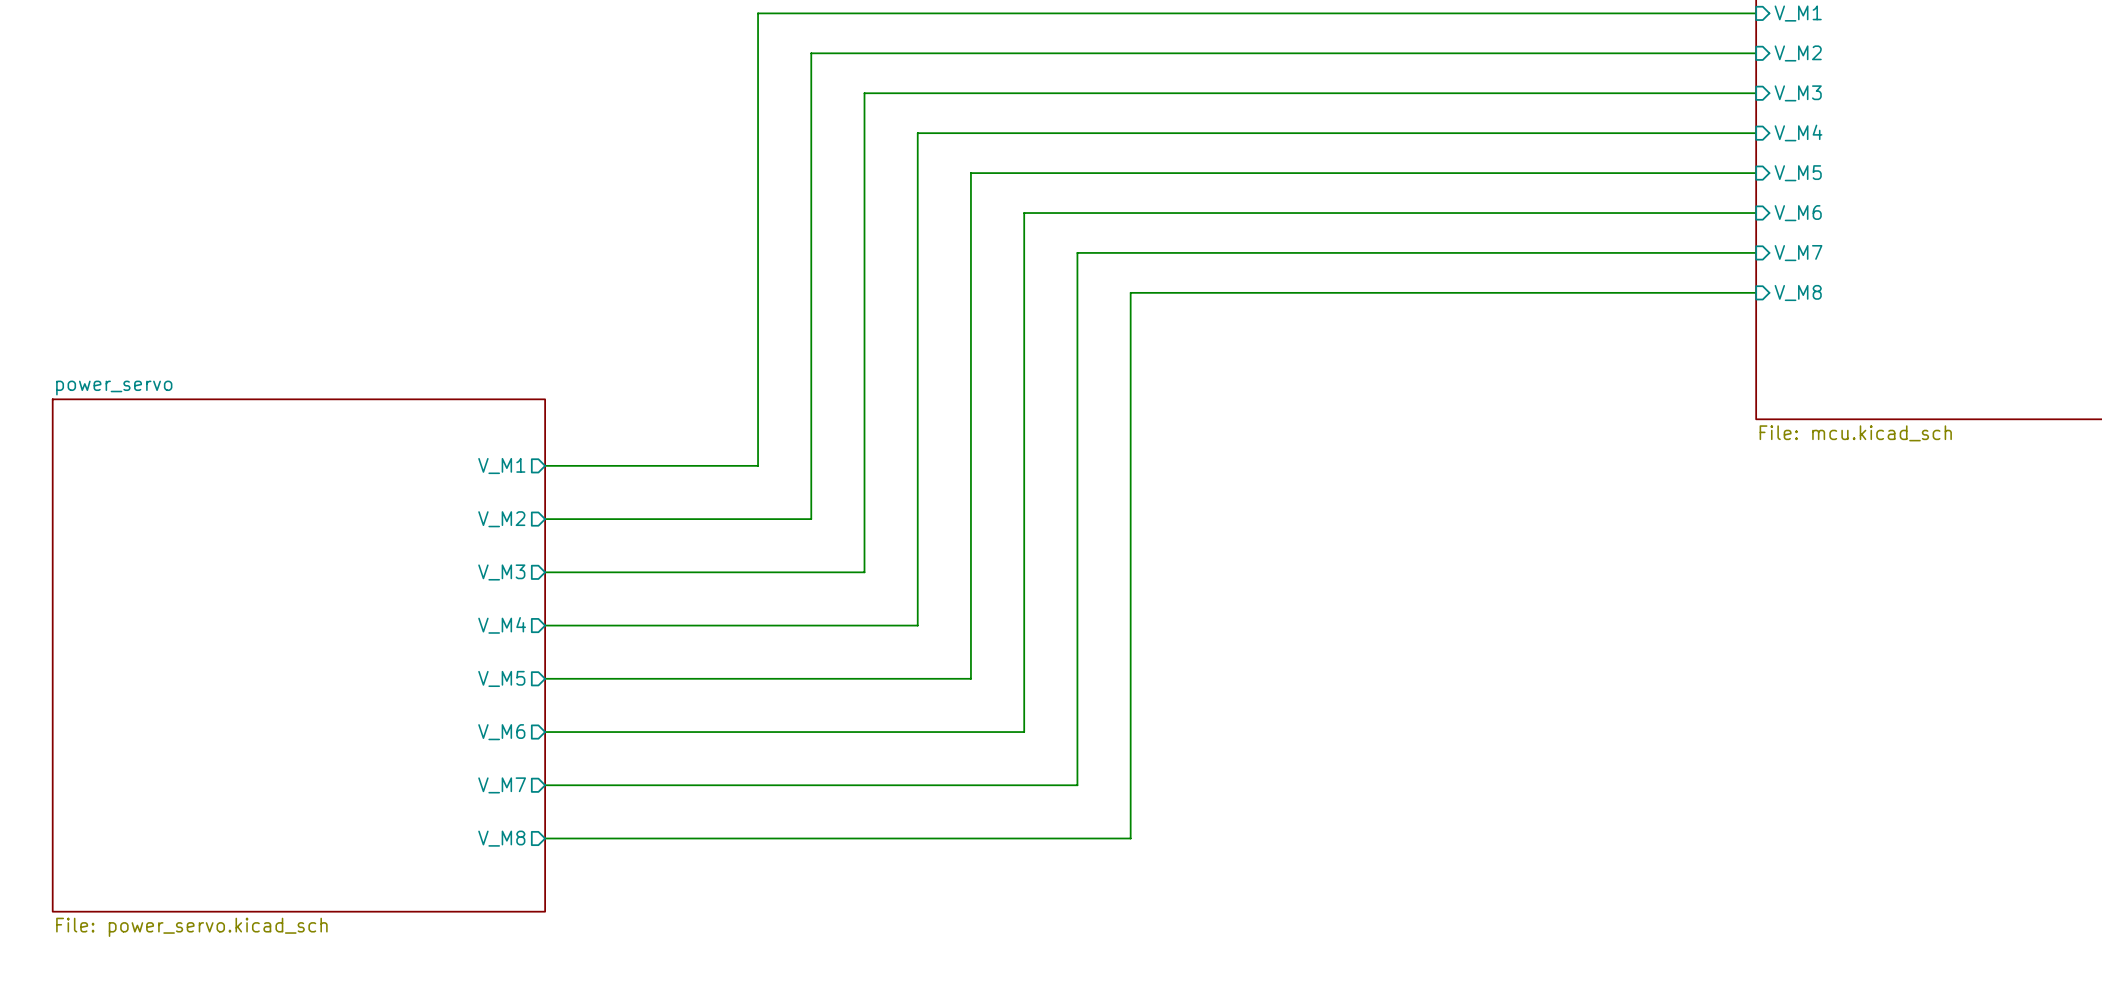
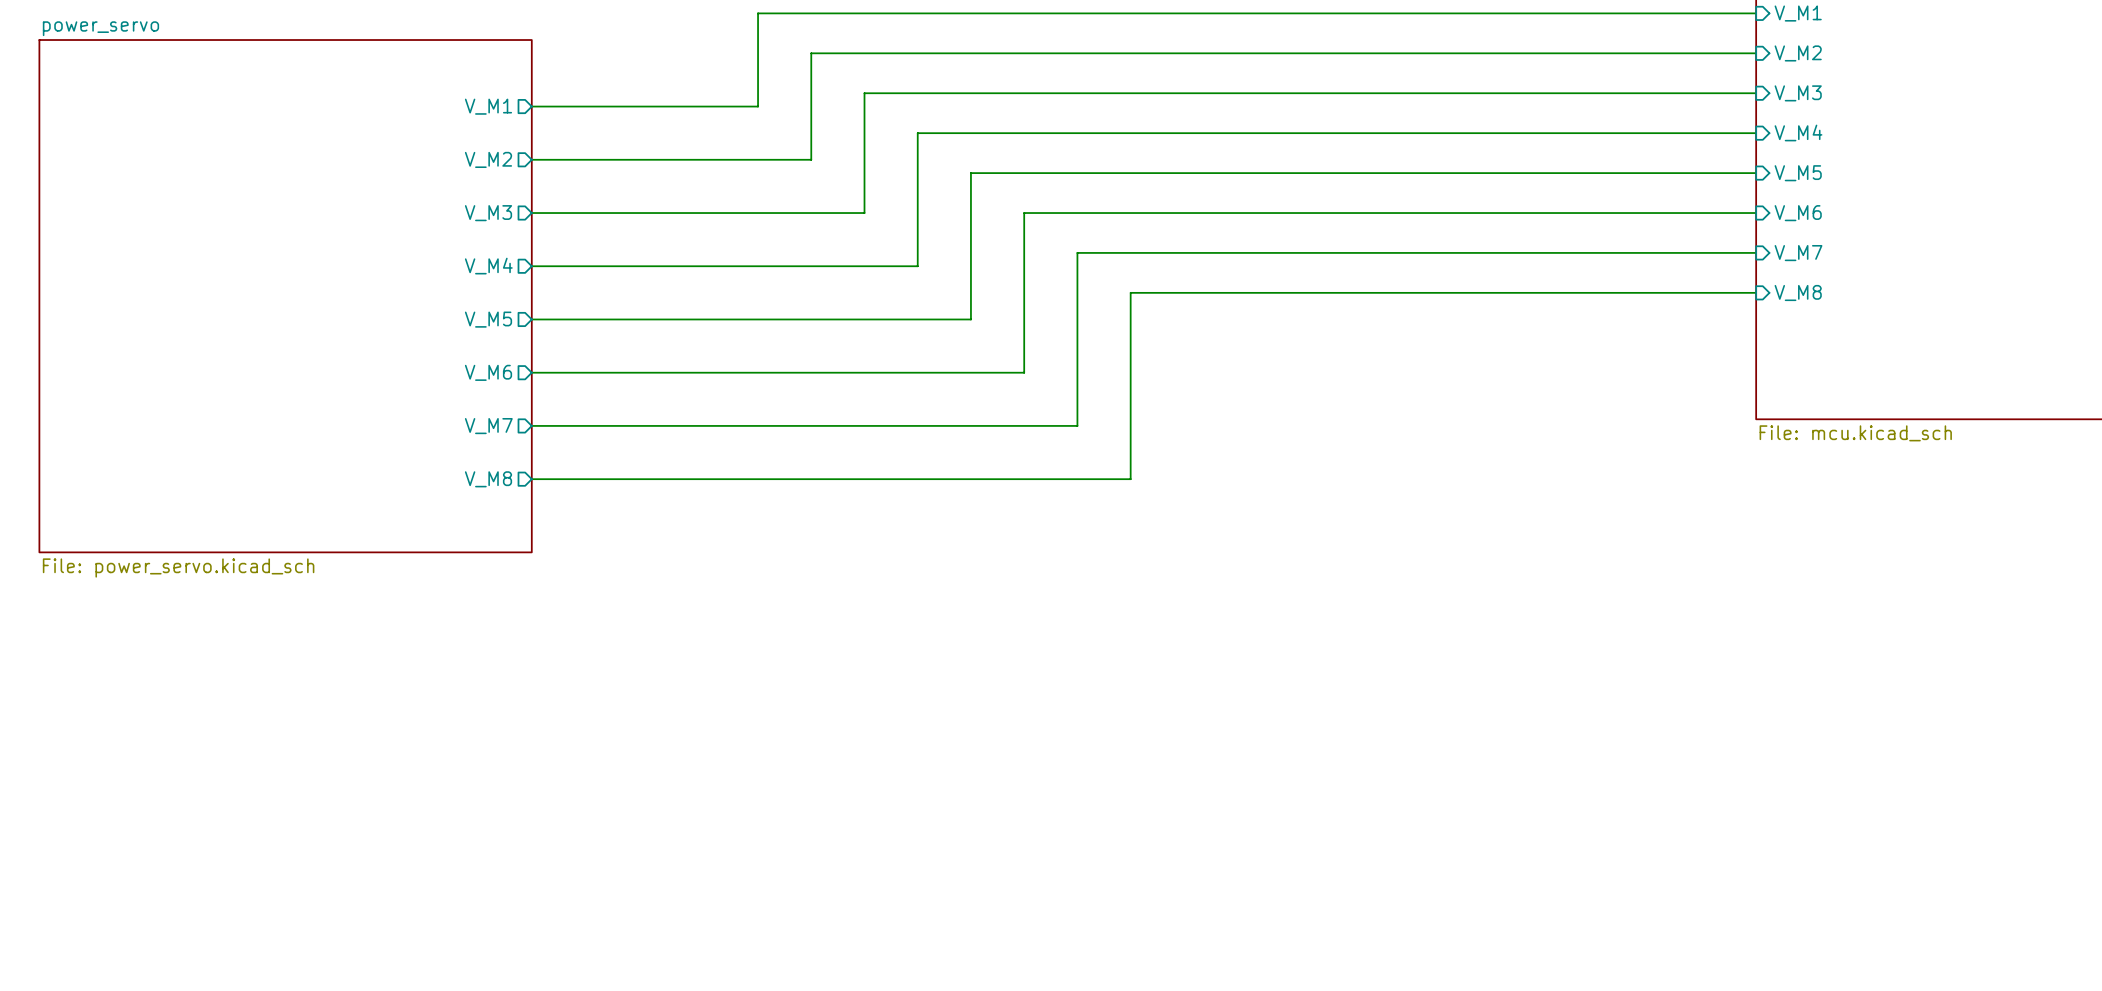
sheet pin: none -> V_M1 (488, 106)
wire: (758, 106) (758, 465) (545, 465) -> (758, 106) (531, 106)
sheet pin: none -> V_M2 (488, 159)
wire: (811, 159) (811, 519) (545, 519) -> (811, 159) (531, 159)
sheet pin: none -> V_M3 (488, 213)
wire: (864, 213) (864, 572) (545, 572) -> (864, 213) (531, 213)
sheet pin: none -> V_M4 (488, 266)
wire: (917, 266) (917, 625) (545, 625) -> (917, 266) (531, 266)
sheet power_servo: none -> File: power_servo.kicad_sch (285, 296)
sheet pin: none -> V_M5 (488, 319)
wire: (970, 319) (970, 678) (545, 678) -> (970, 319) (531, 319)
sheet pin: none -> V_M6 (488, 372)
wire: (1024, 372) (1024, 732) (545, 732) -> (1024, 372) (531, 372)
wire: (1077, 425) (1077, 785) (545, 785) -> (1077, 425) (531, 425)
sheet pin: none -> V_M7 (488, 426)
sheet pin: V_M1 (501, 466) -> V_M8 (488, 479)
wire: (1130, 479) (1130, 838) (545, 838) -> (1130, 479) (531, 479)
sheet pin: V_M2 (501, 519) -> none
sheet pin: V_M3 (501, 572) -> none
sheet pin: V_M4 (502, 625) -> none
sheet power_servo: File: power_servo.kicad_sch (298, 655) -> none
sheet pin: V_M5 (501, 678) -> none
sheet pin: V_M6 (501, 732) -> none
sheet pin: V_M7 (502, 785) -> none
sheet pin: V_M8 (501, 838) -> none

